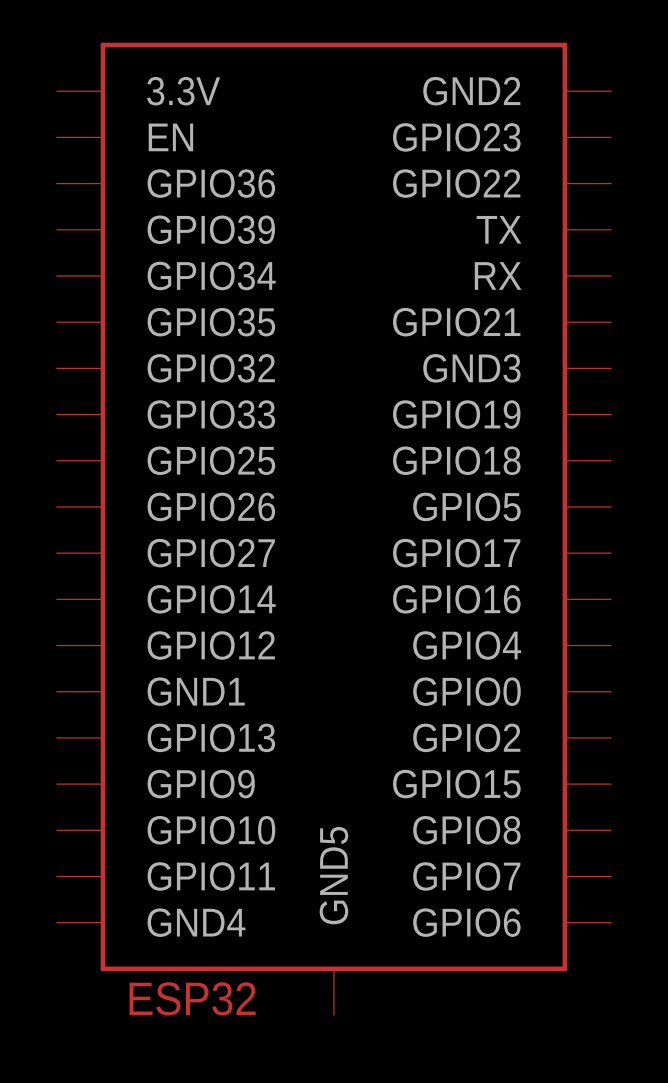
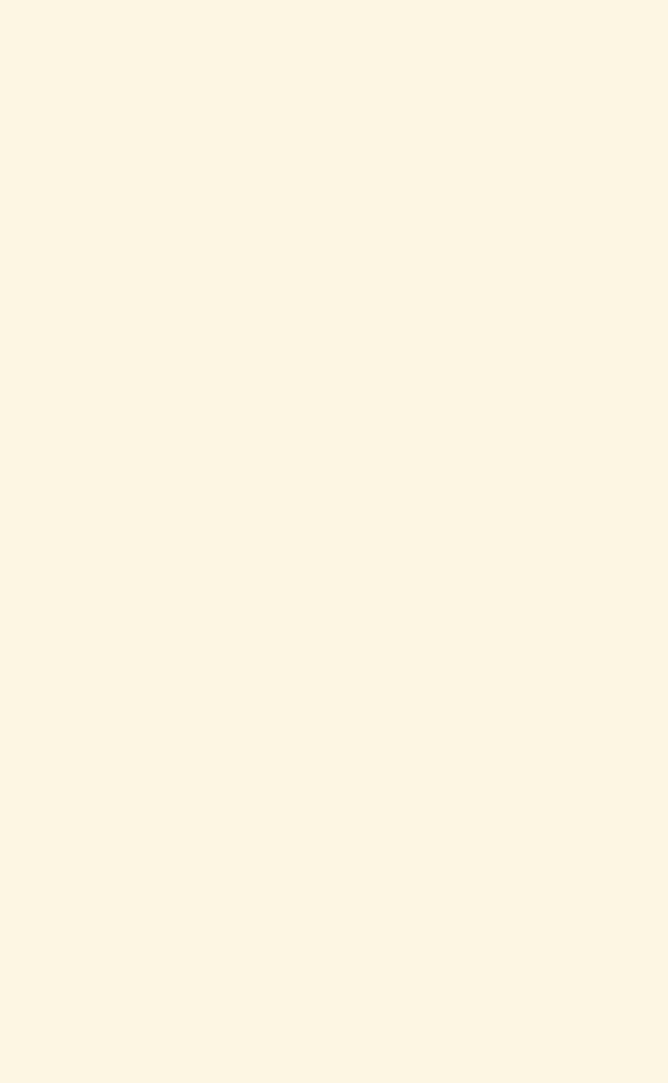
part: (333, 528) -> none

